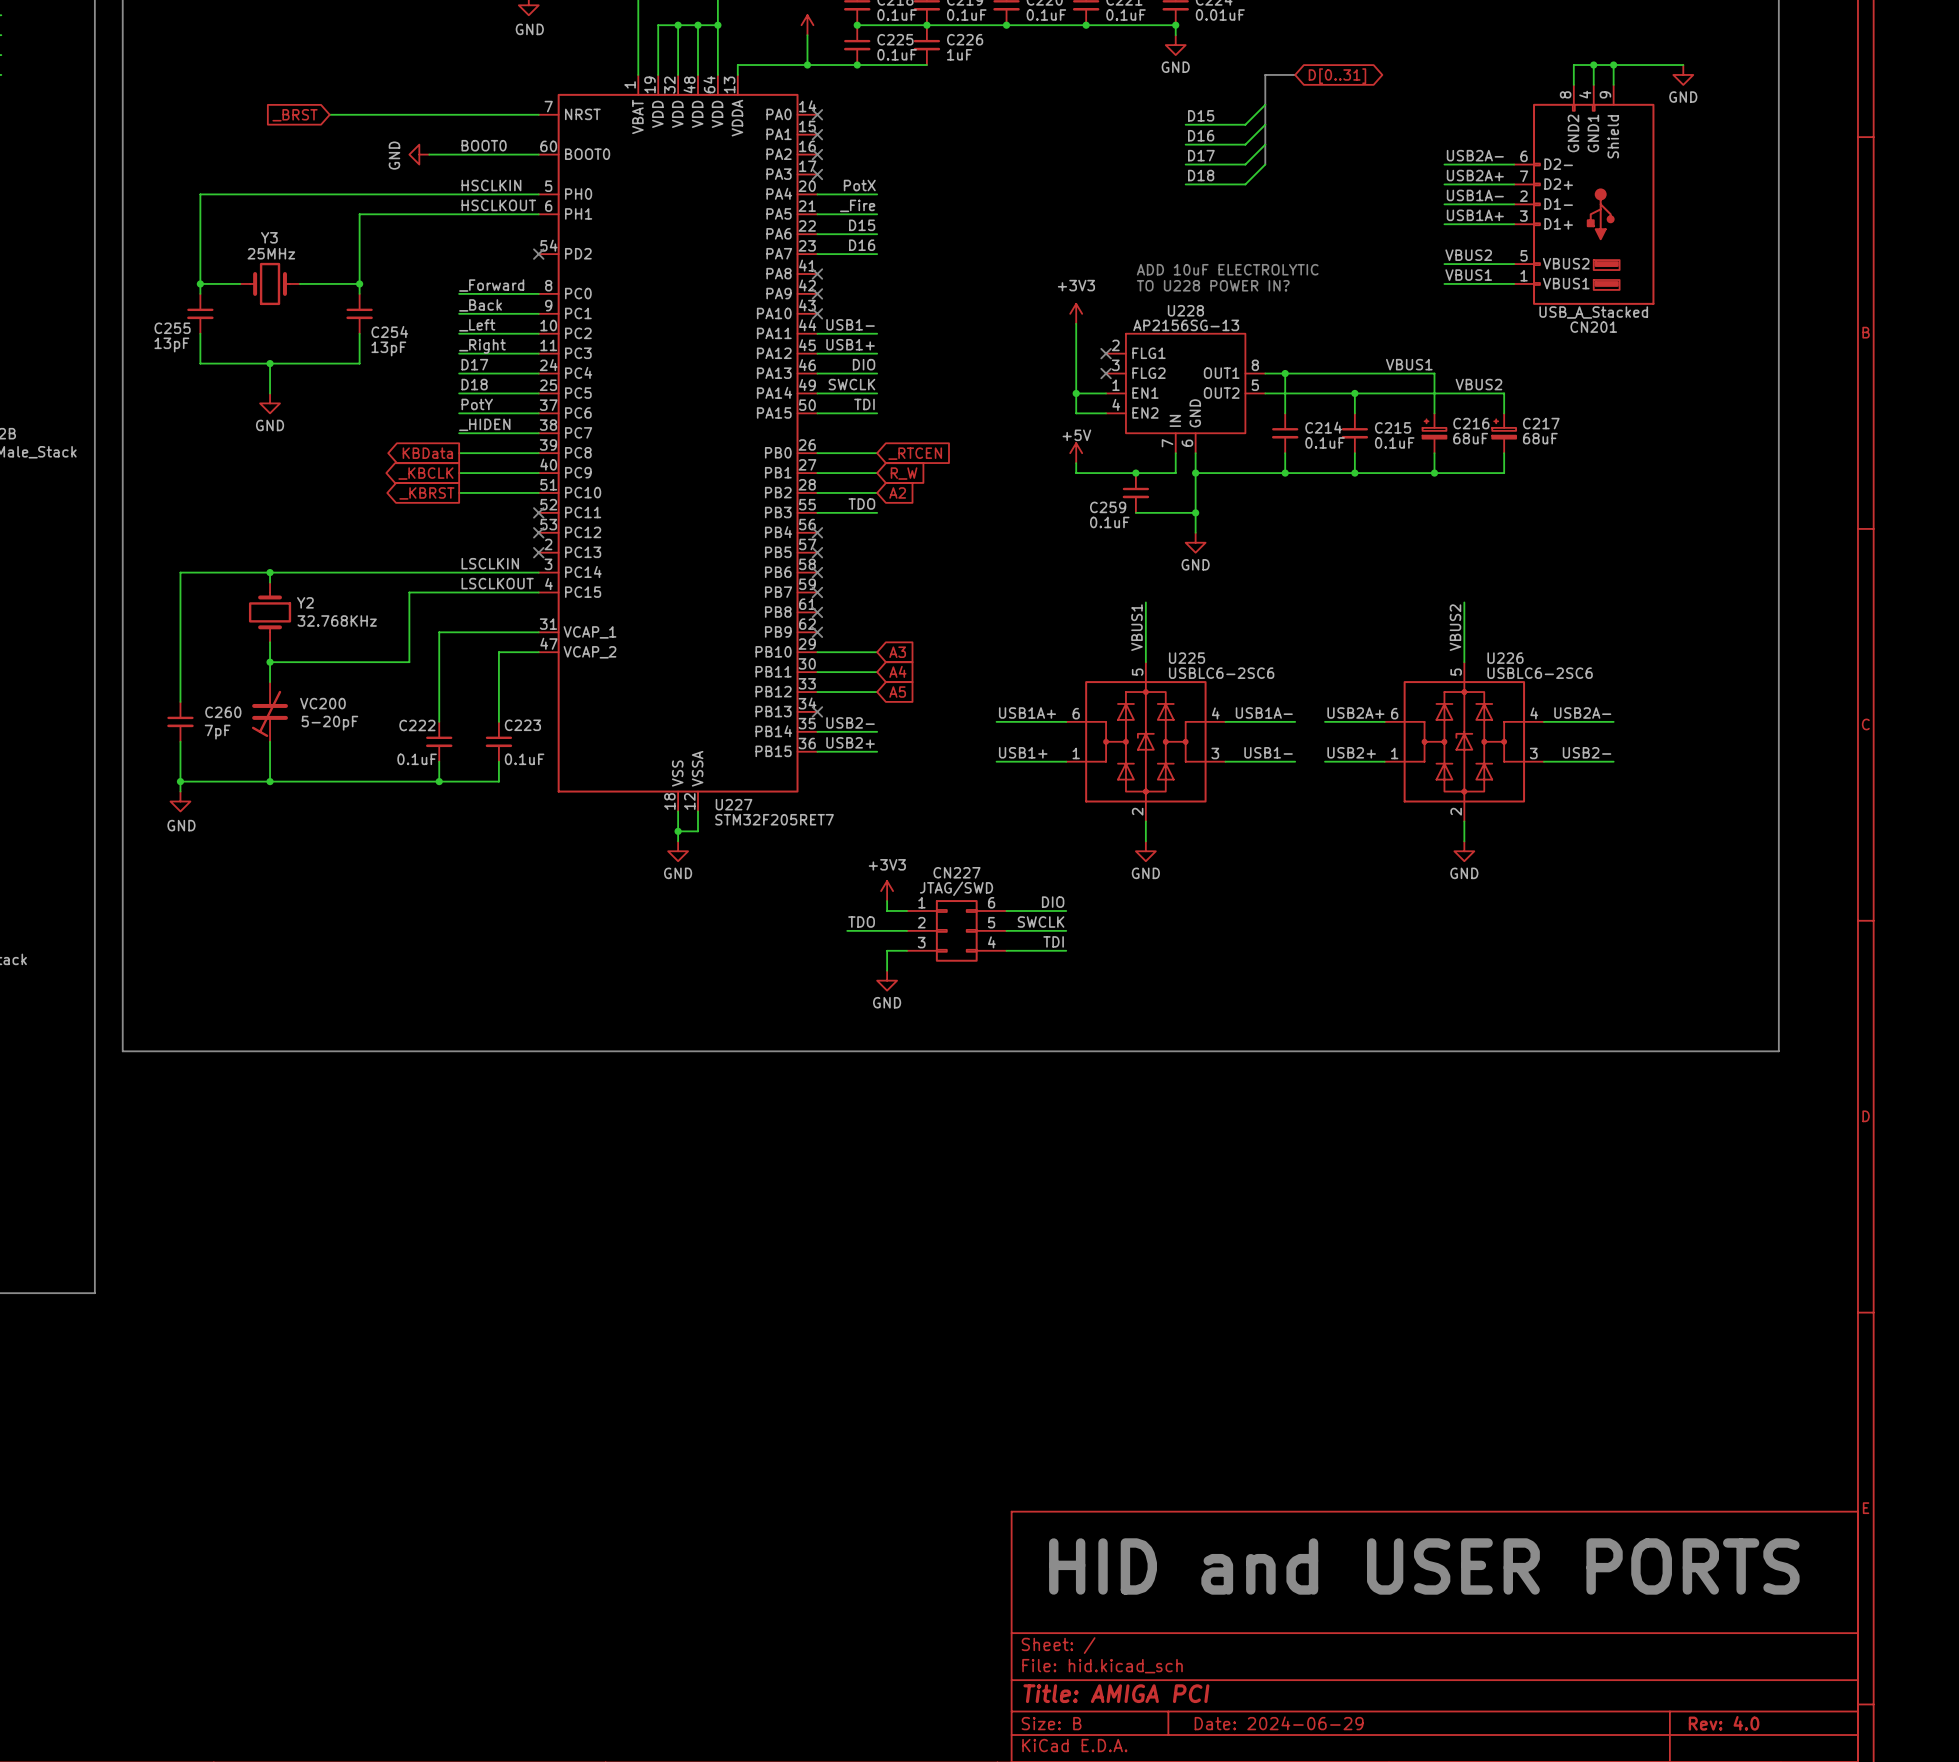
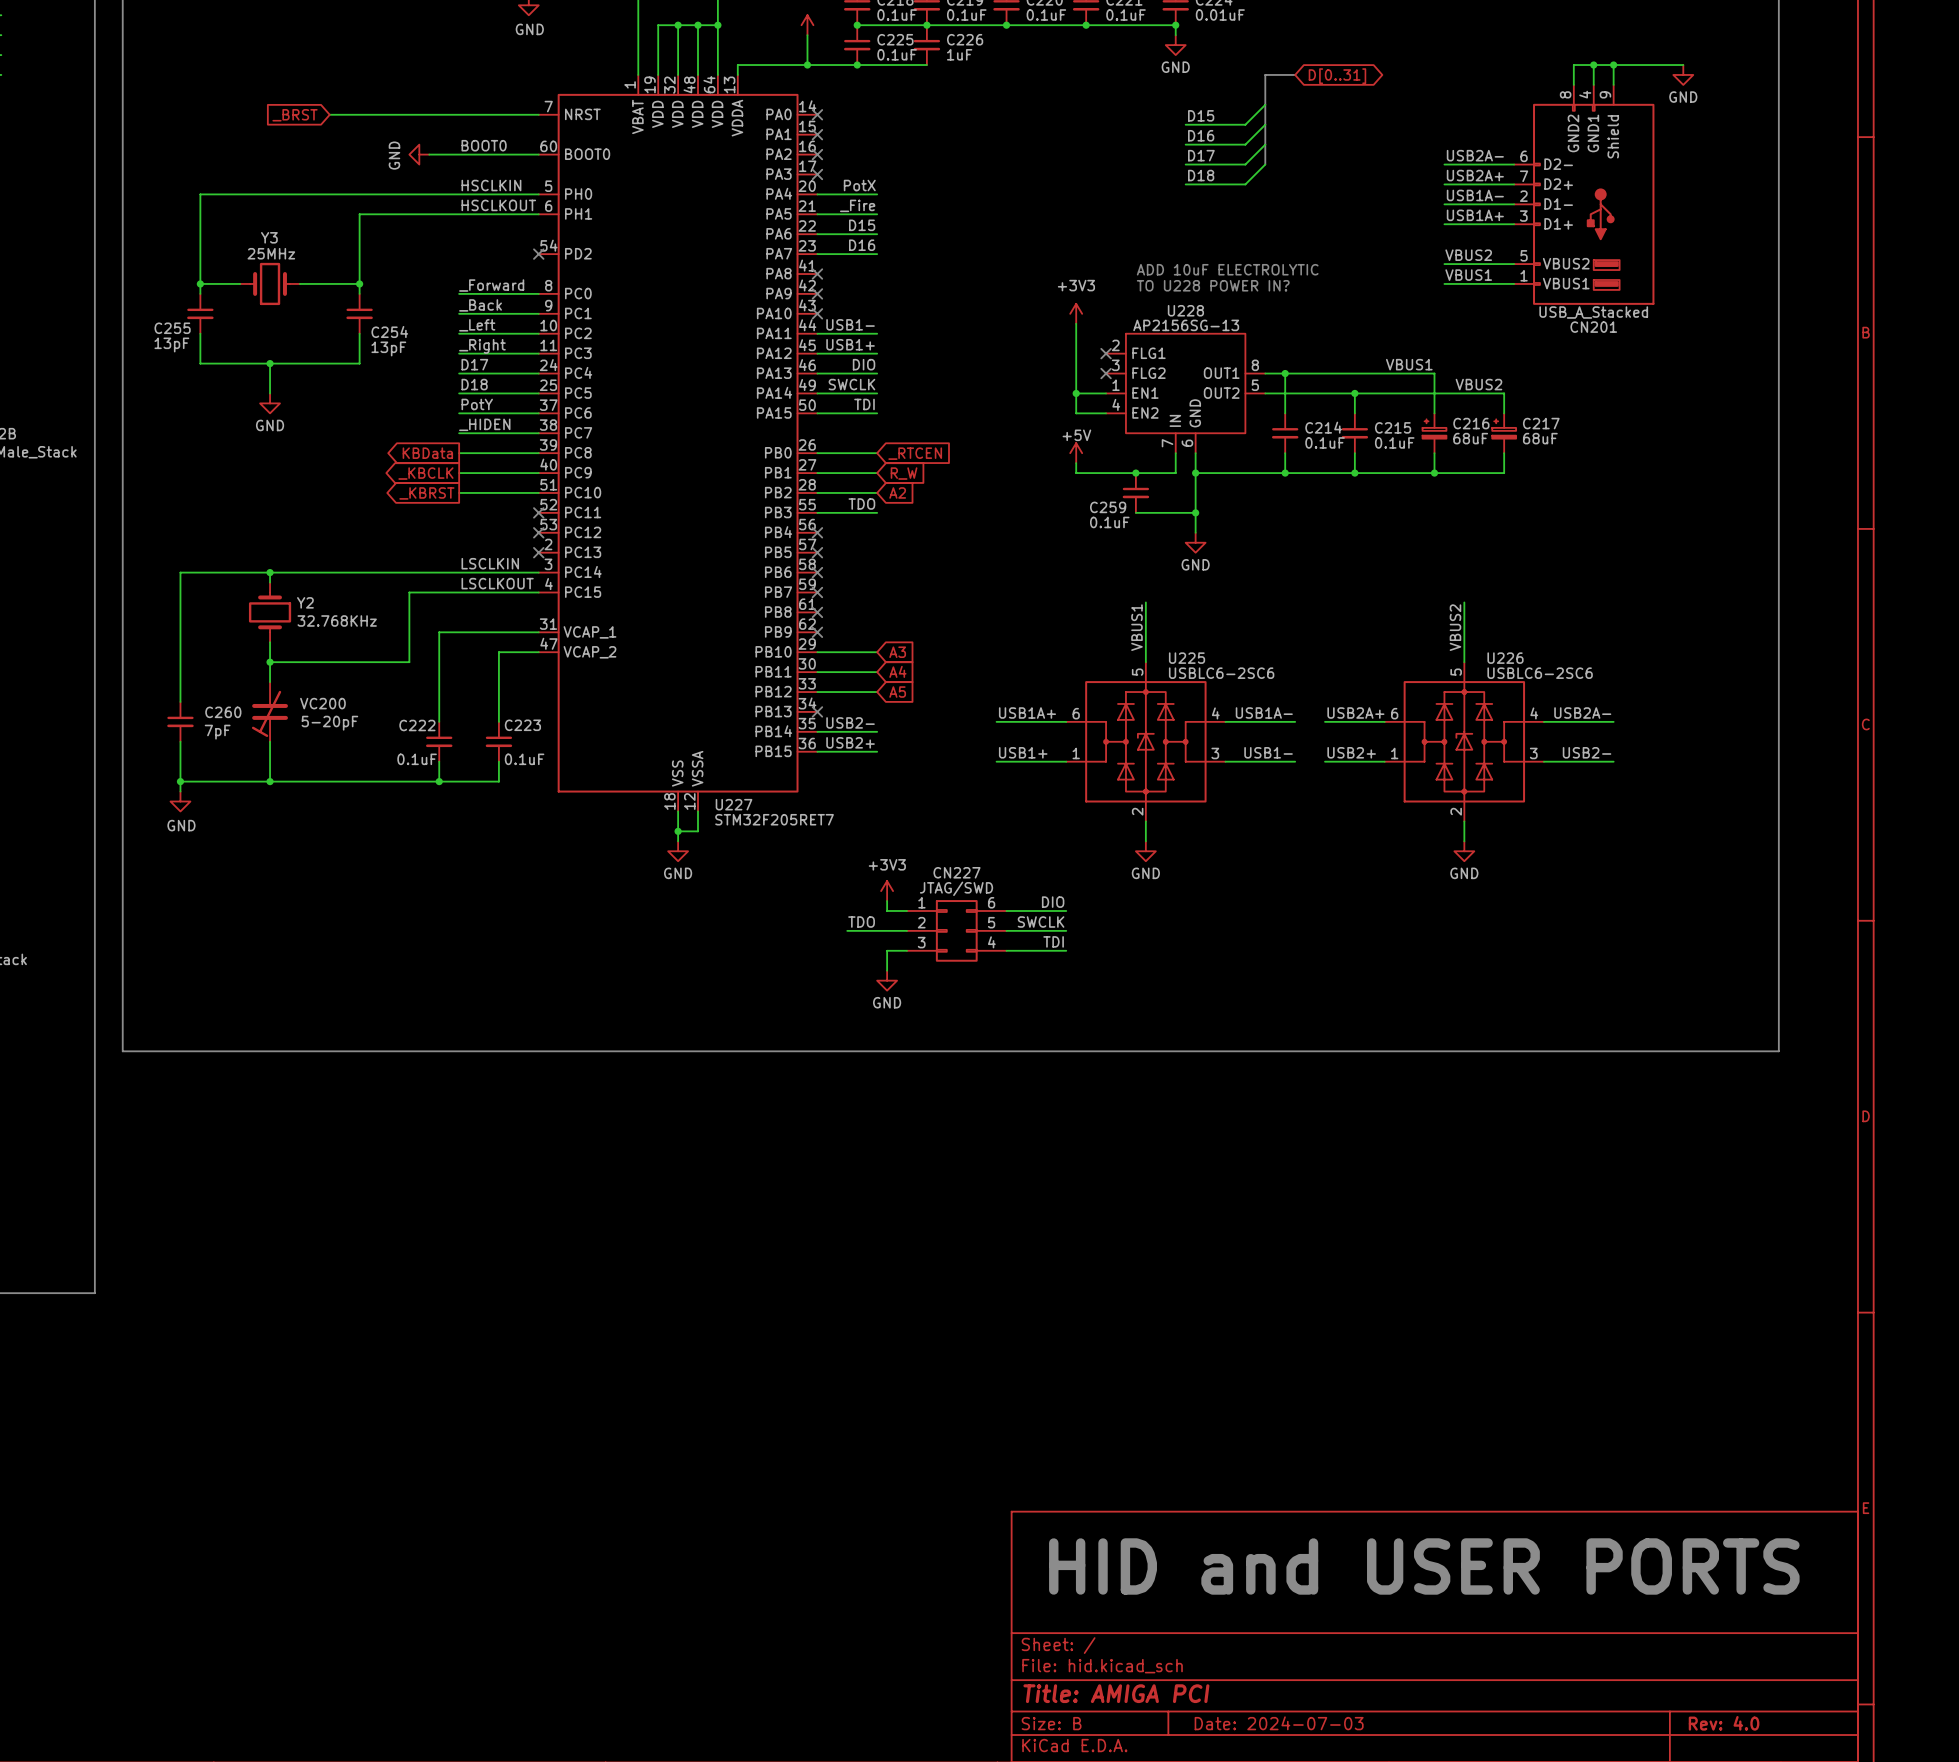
title block: Date: 2024-06-29 (1279, 1723) -> Date: 2024-07-03 (1279, 1723)

